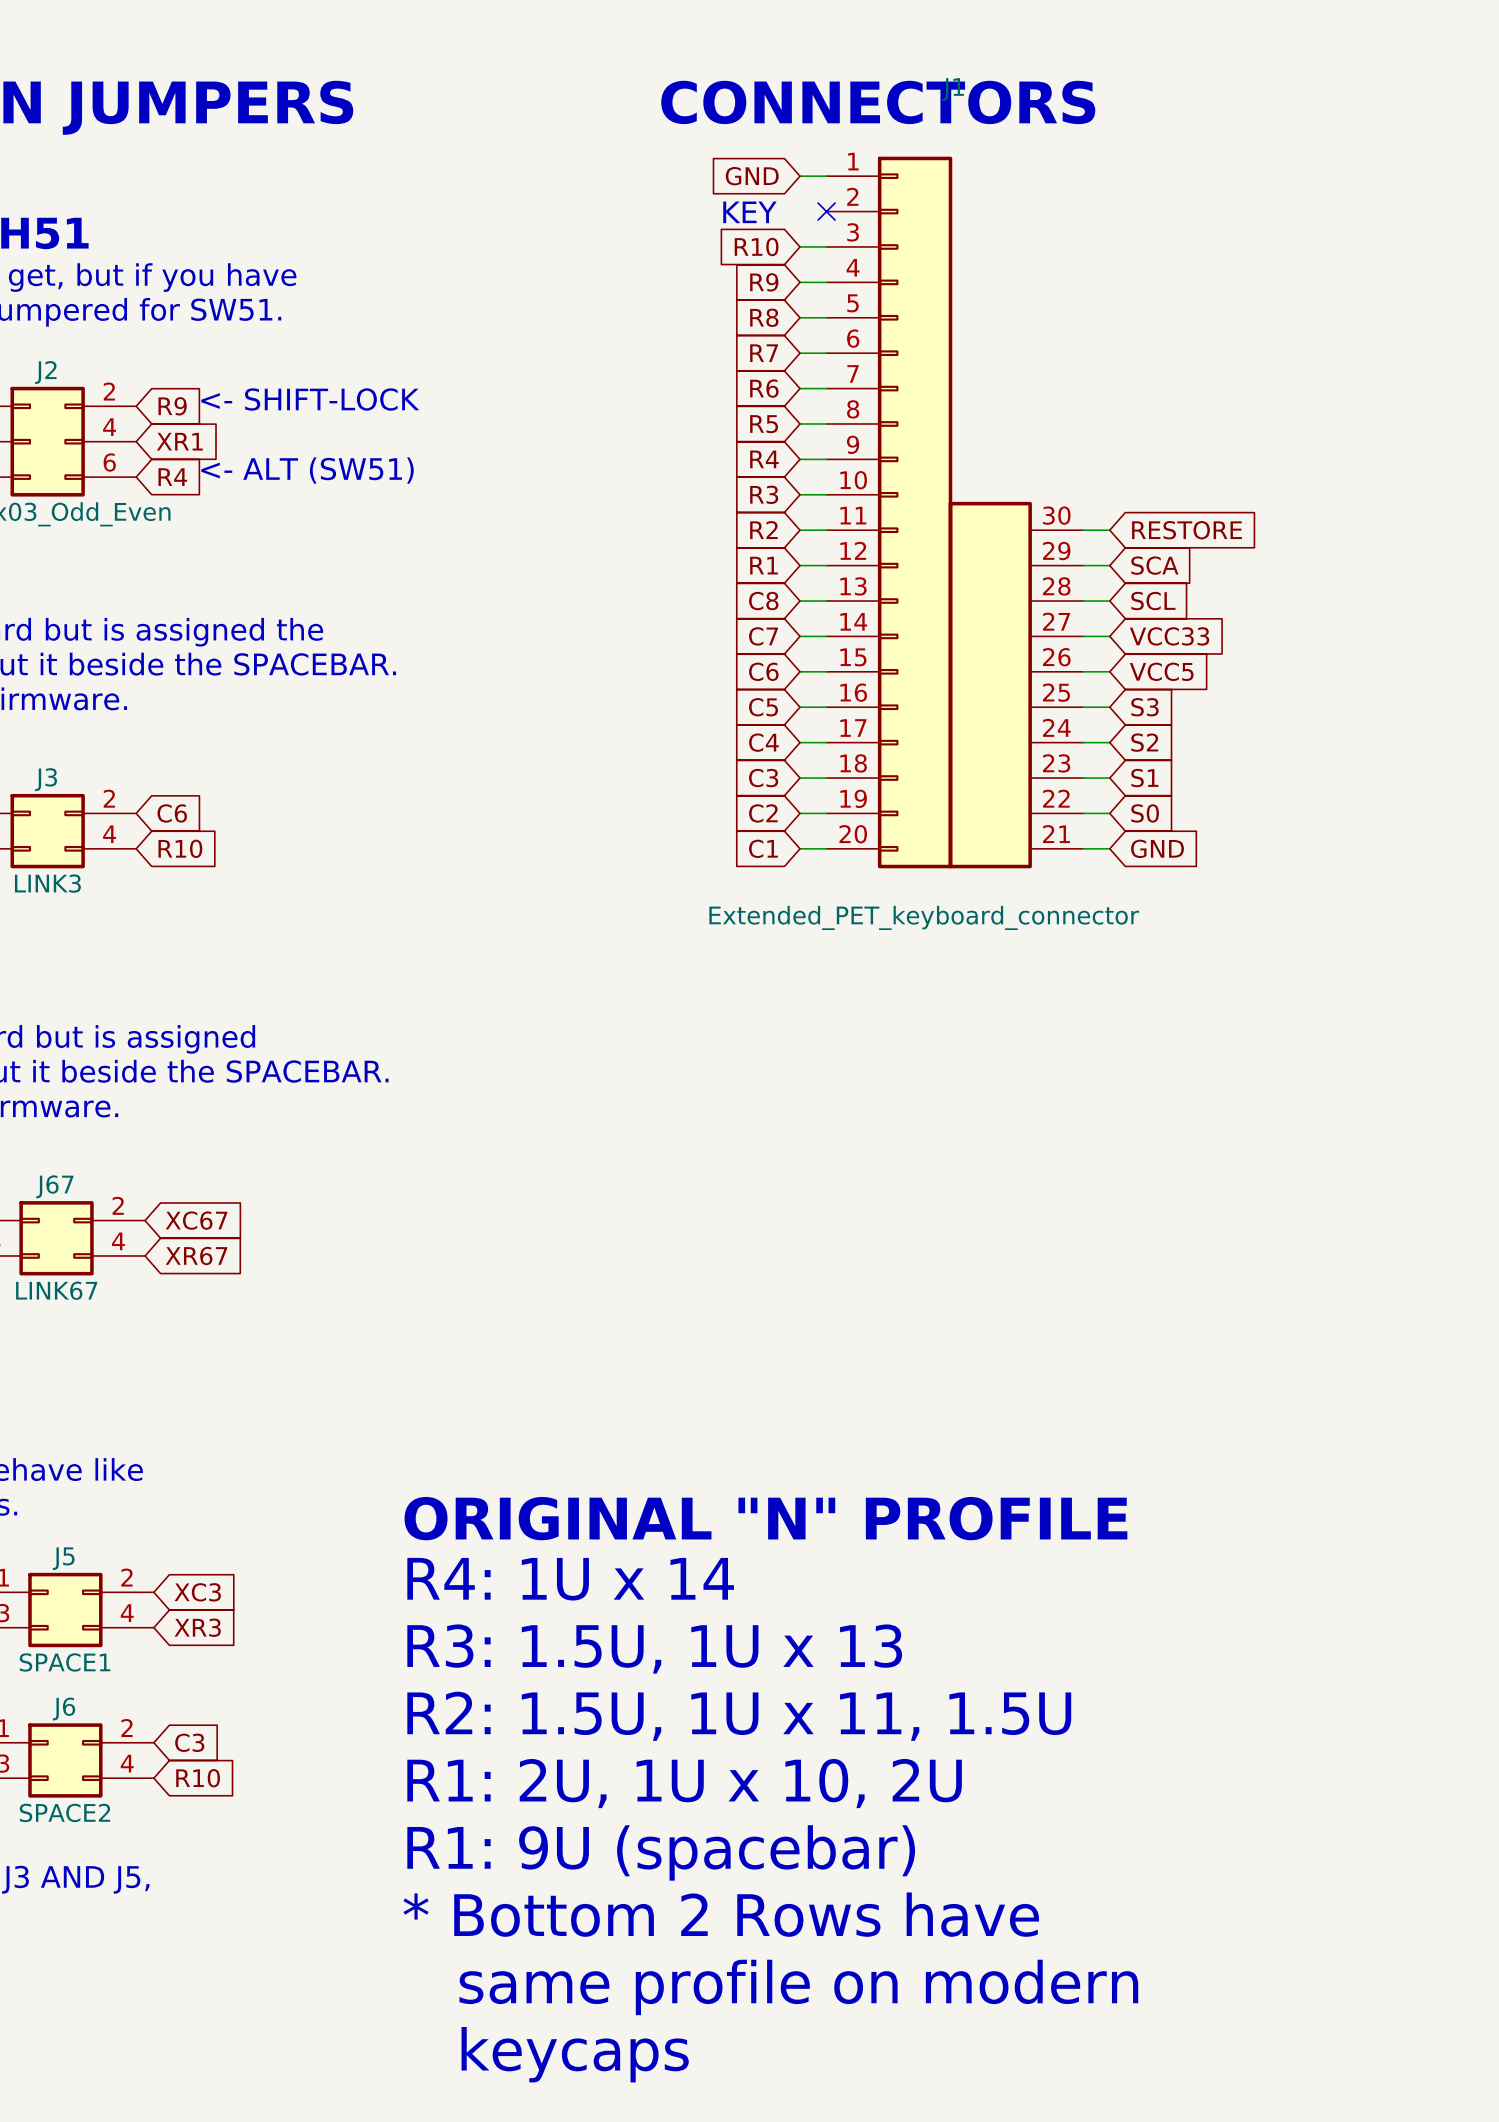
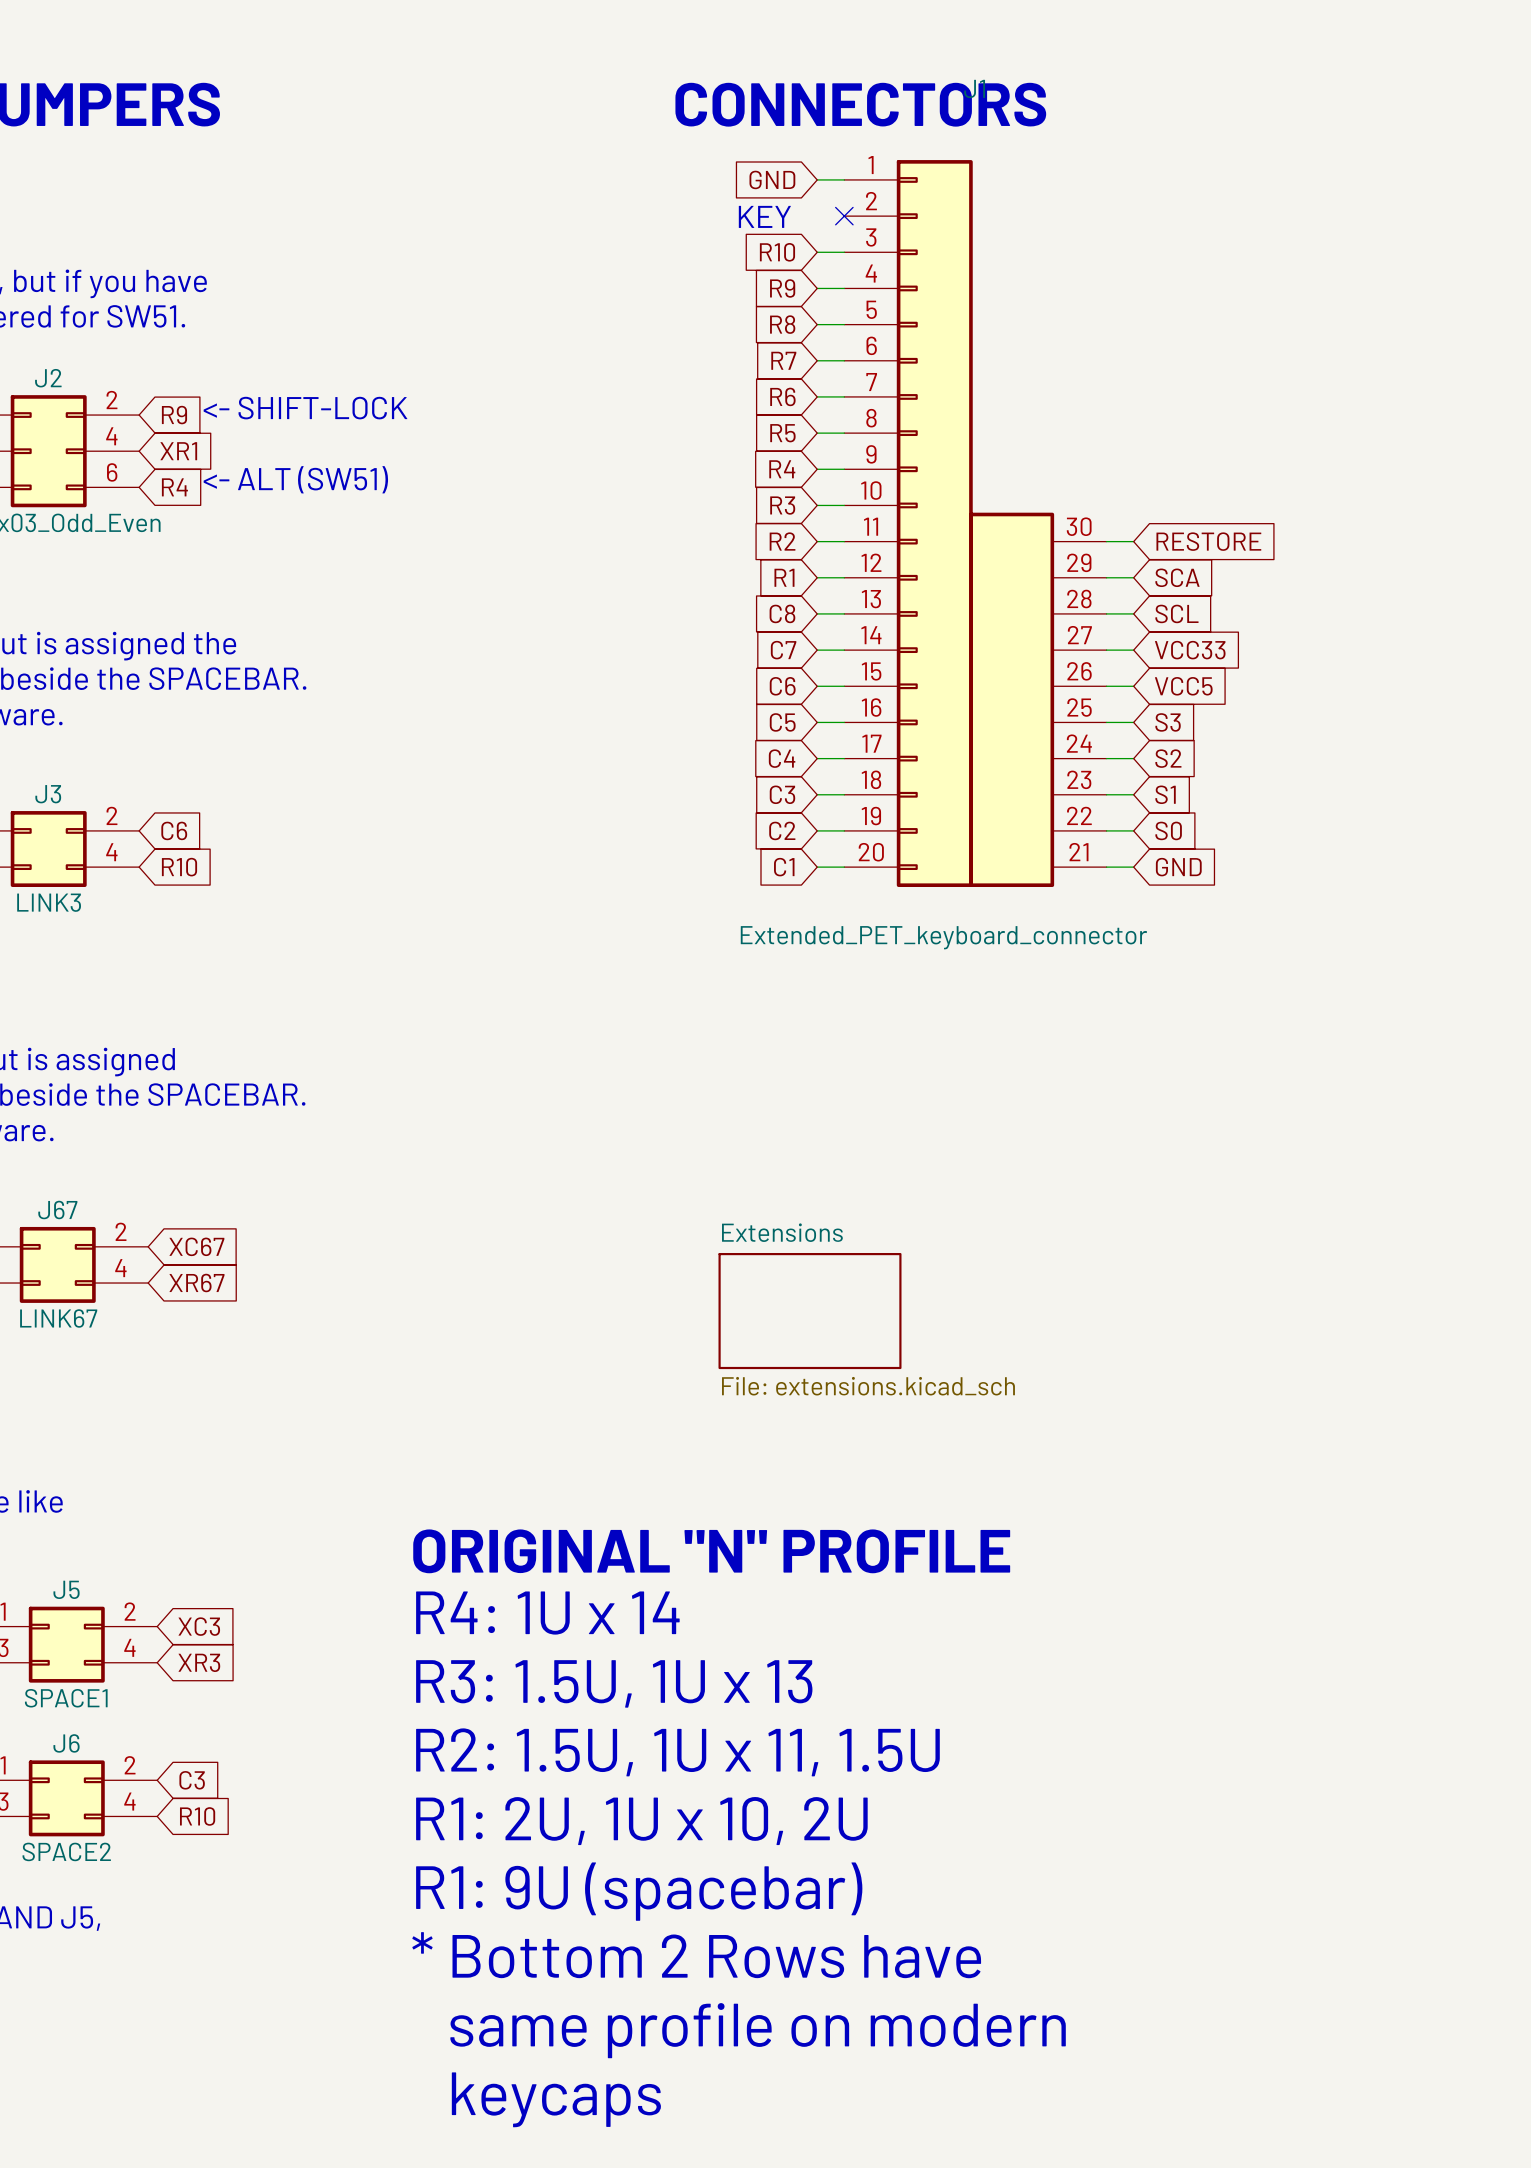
sheet Extensions: none -> File: extensions.kicad_sch (810, 1311)

